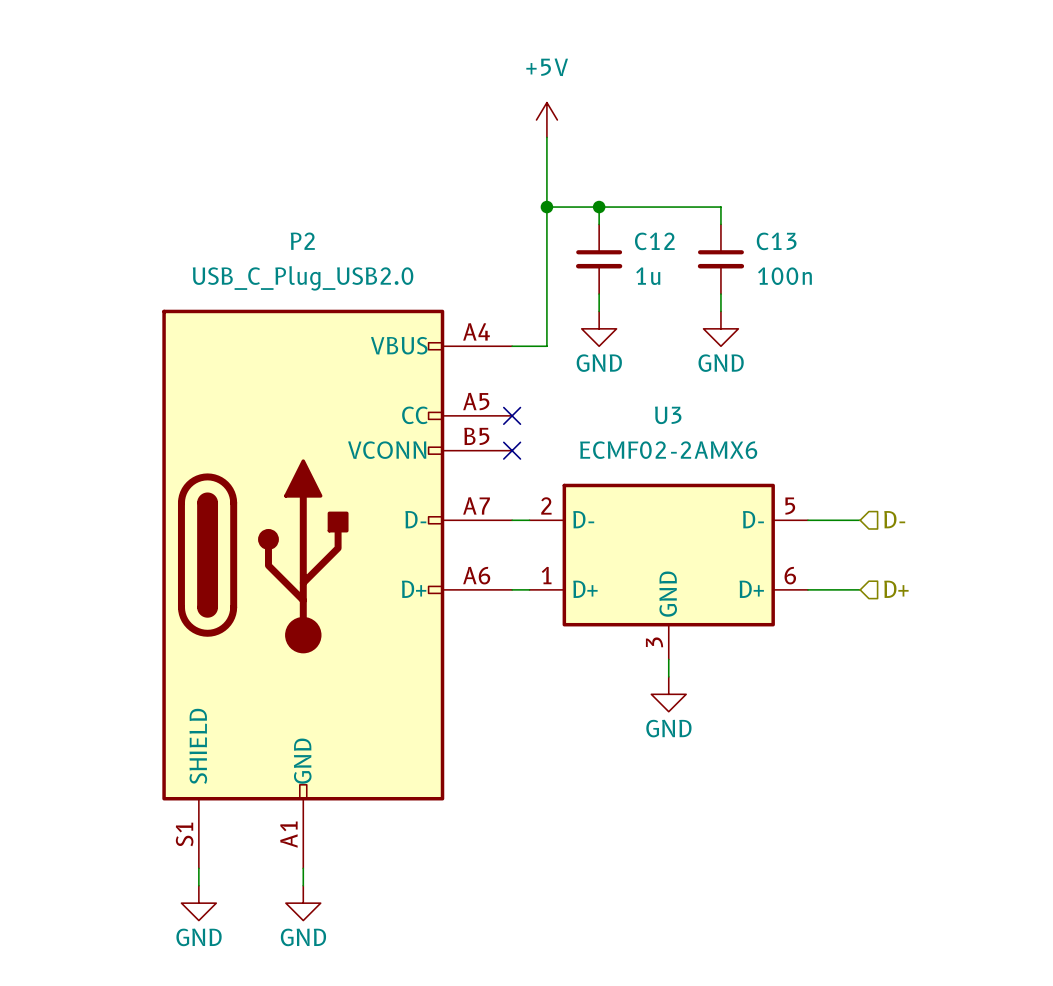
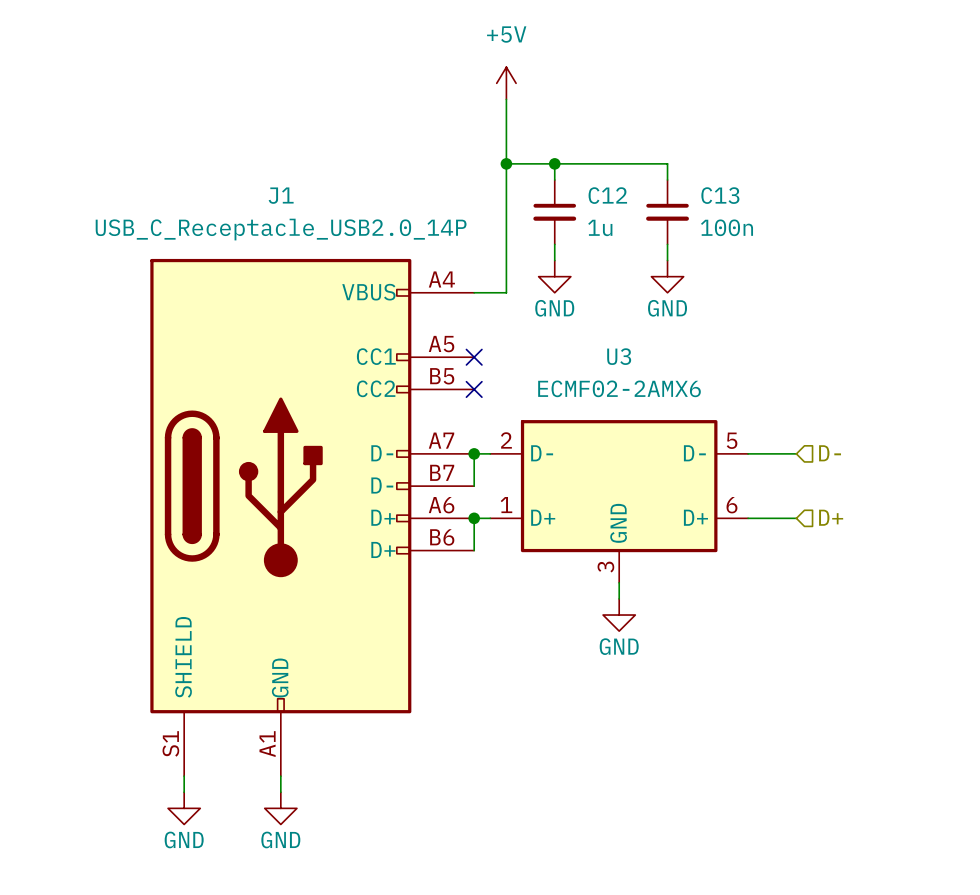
wire: none -> (474, 453) (474, 486)
junction: none -> (474, 453)
P2: USB_C_Plug_USB2.0 (337, 589) -> none
J1: none -> USB_C_Receptacle_USB2.0_14P (312, 517)
wire: none -> (474, 518) (474, 550)
junction: none -> (474, 518)

